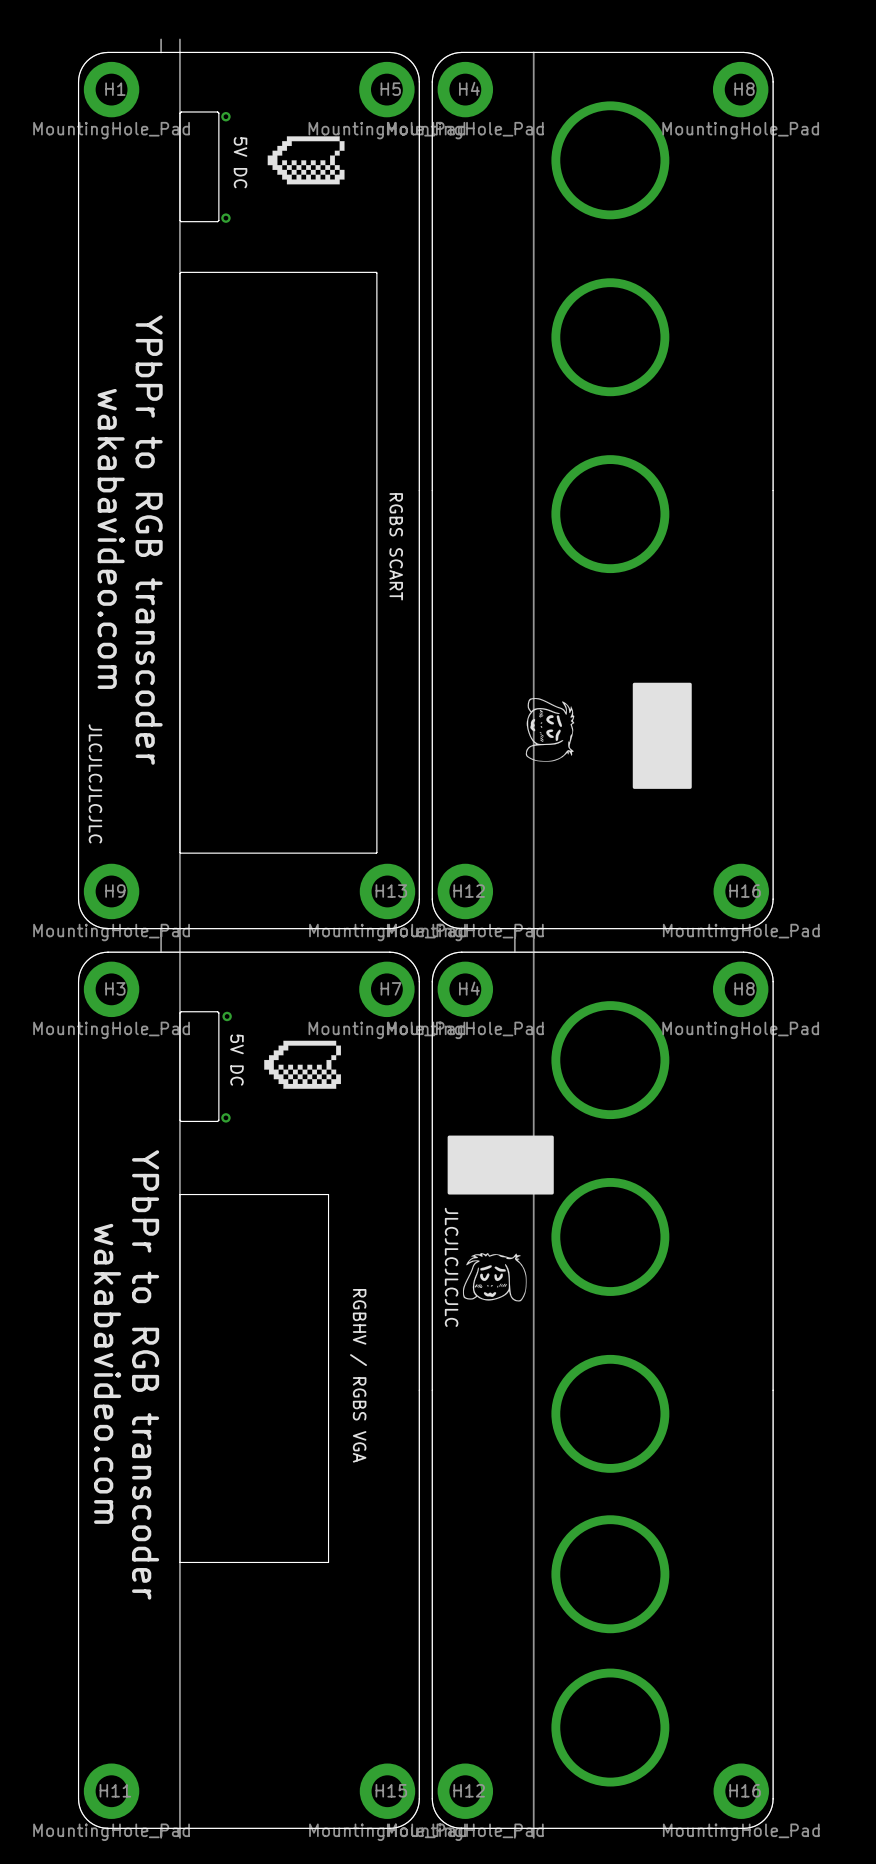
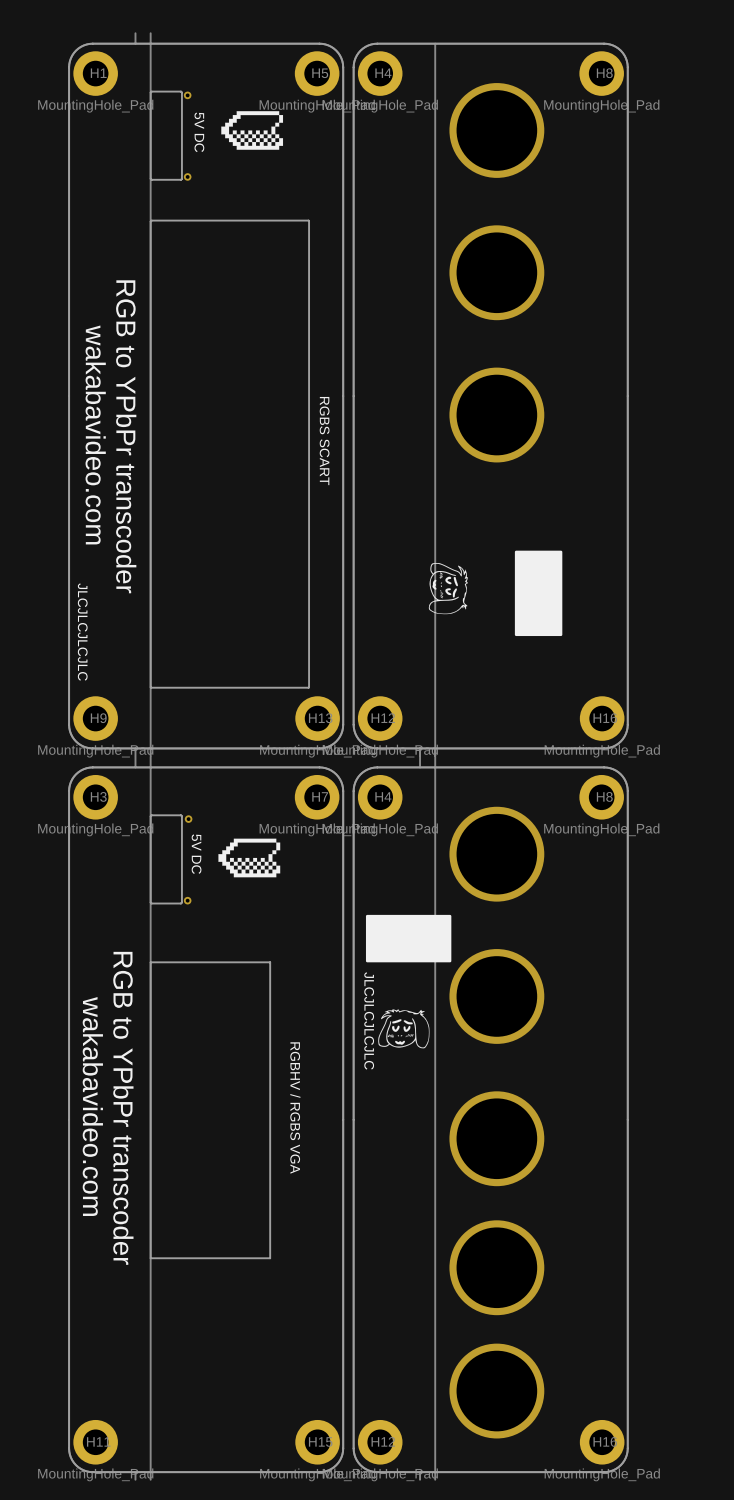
text: YPbPr to RGB transcoder (149, 540) -> RGB to YPbPr transcoder (126, 436)
text: YPbPr to RGB transcoder (145, 1374) -> RGB to YPbPr transcoder (123, 1108)

